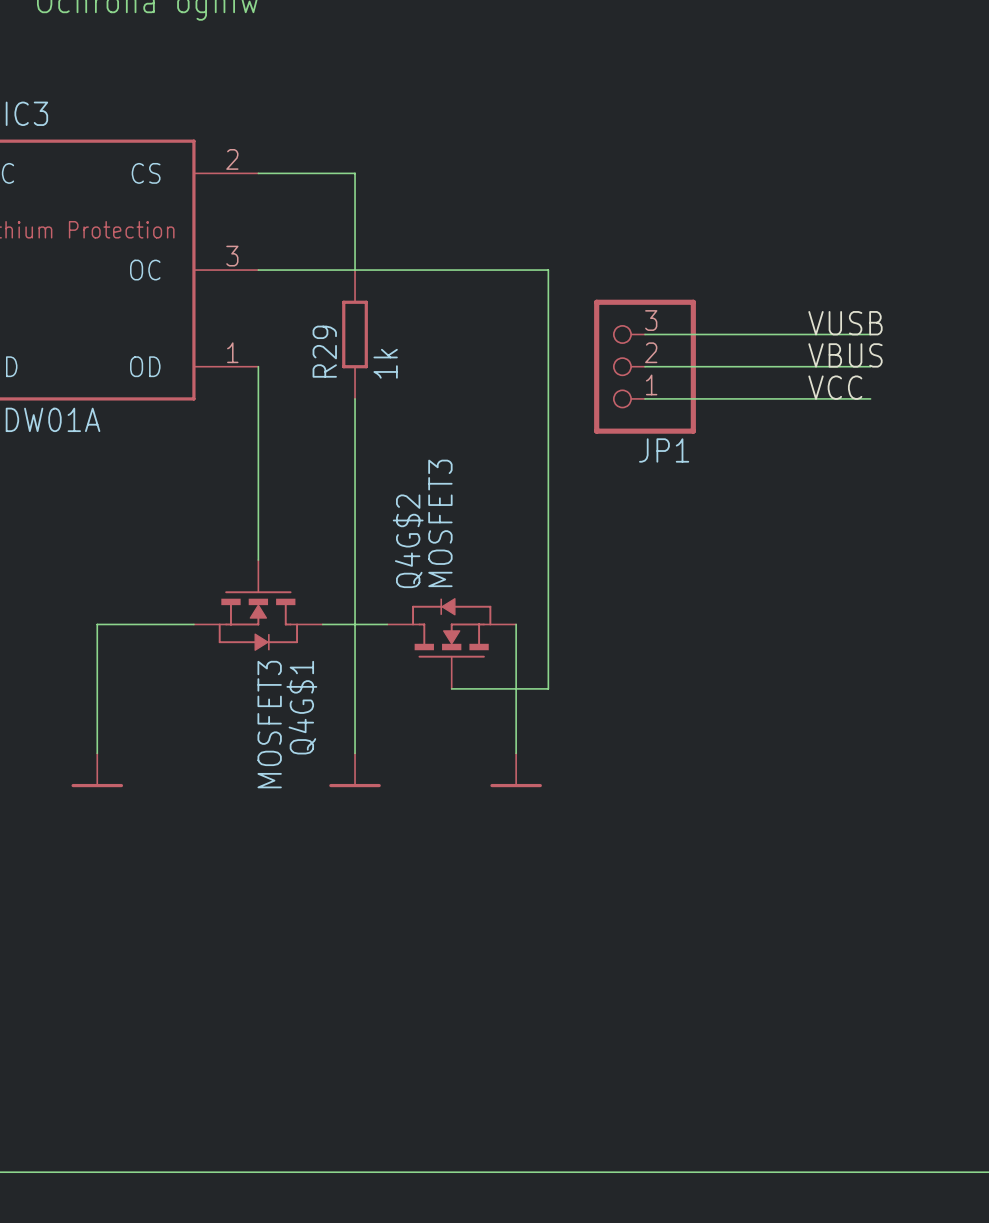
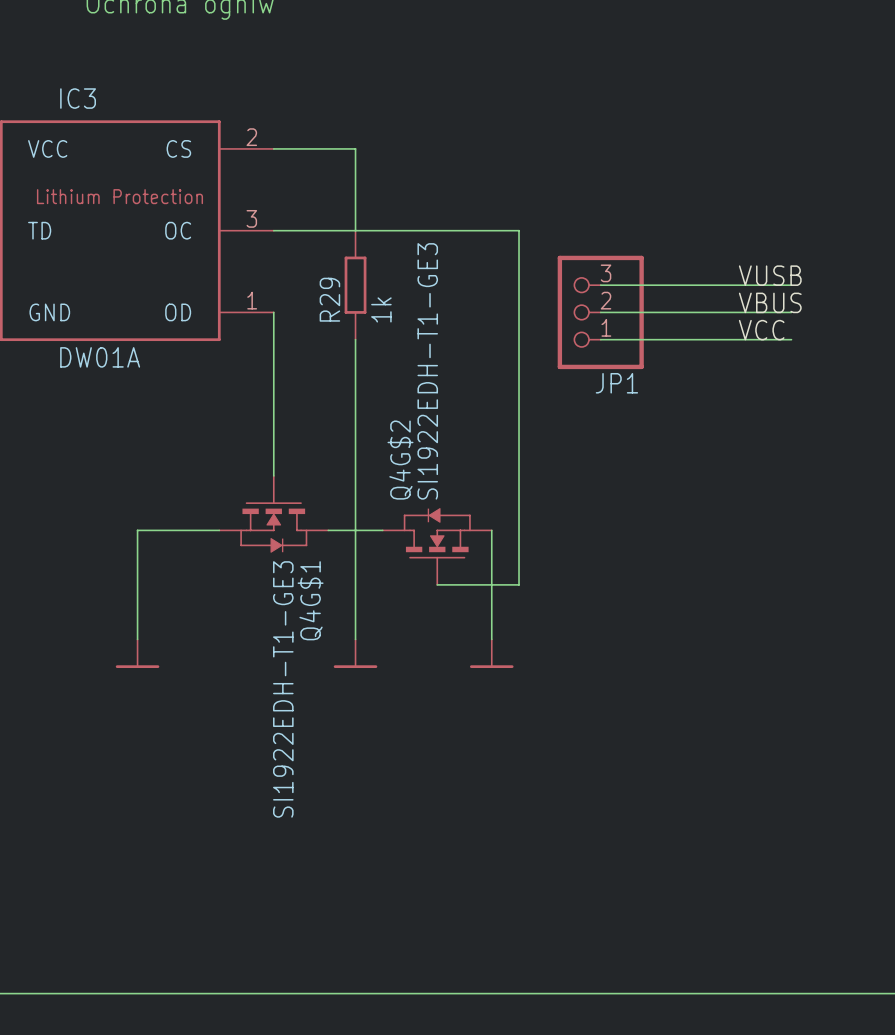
Q4G$2 value: MOSFET3 (440, 523) -> SI1922EDH-T1-GE3 (427, 371)
Q4G$1 value: MOSFET3 (269, 724) -> SI1922EDH-T1-GE3 (283, 689)

